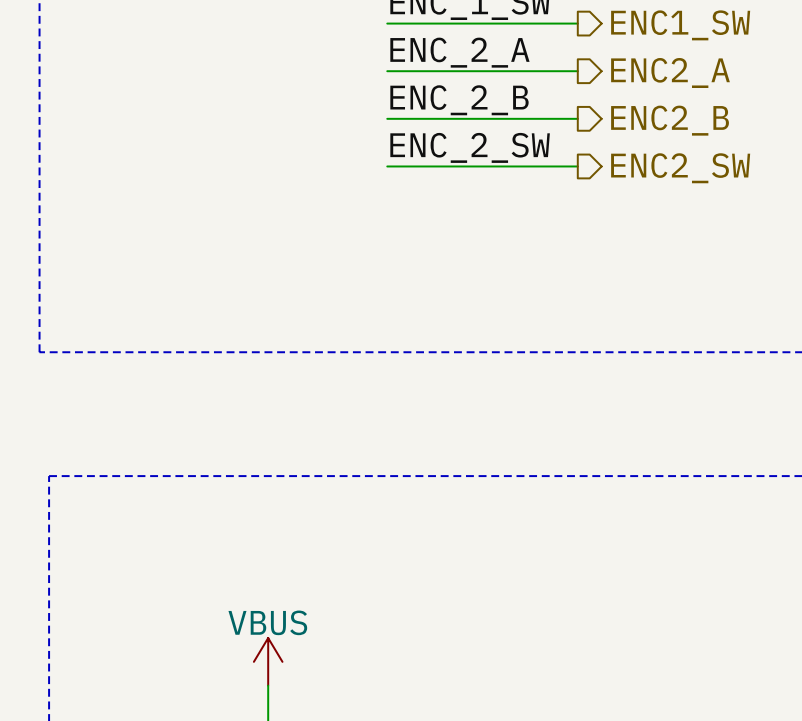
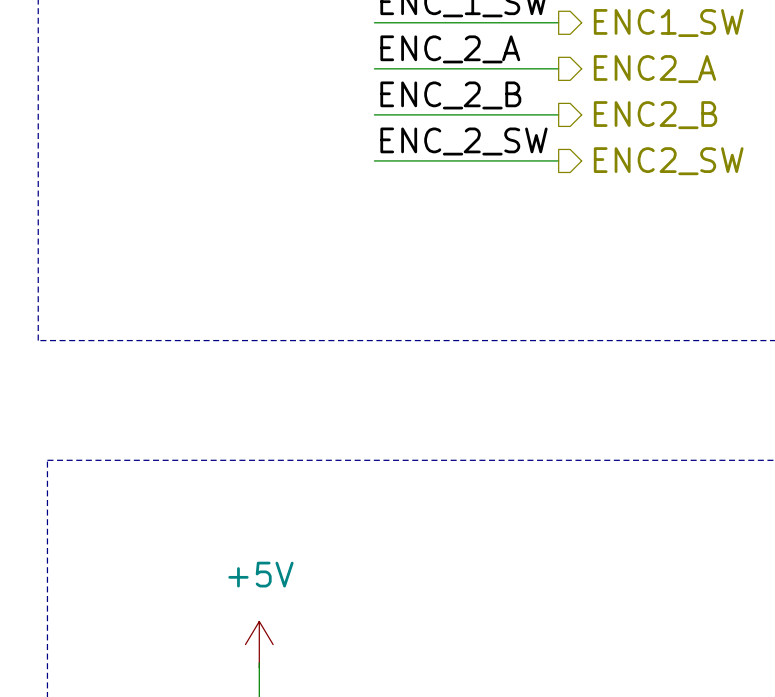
power symbol: VBUS (268, 661) -> +5V (259, 644)

